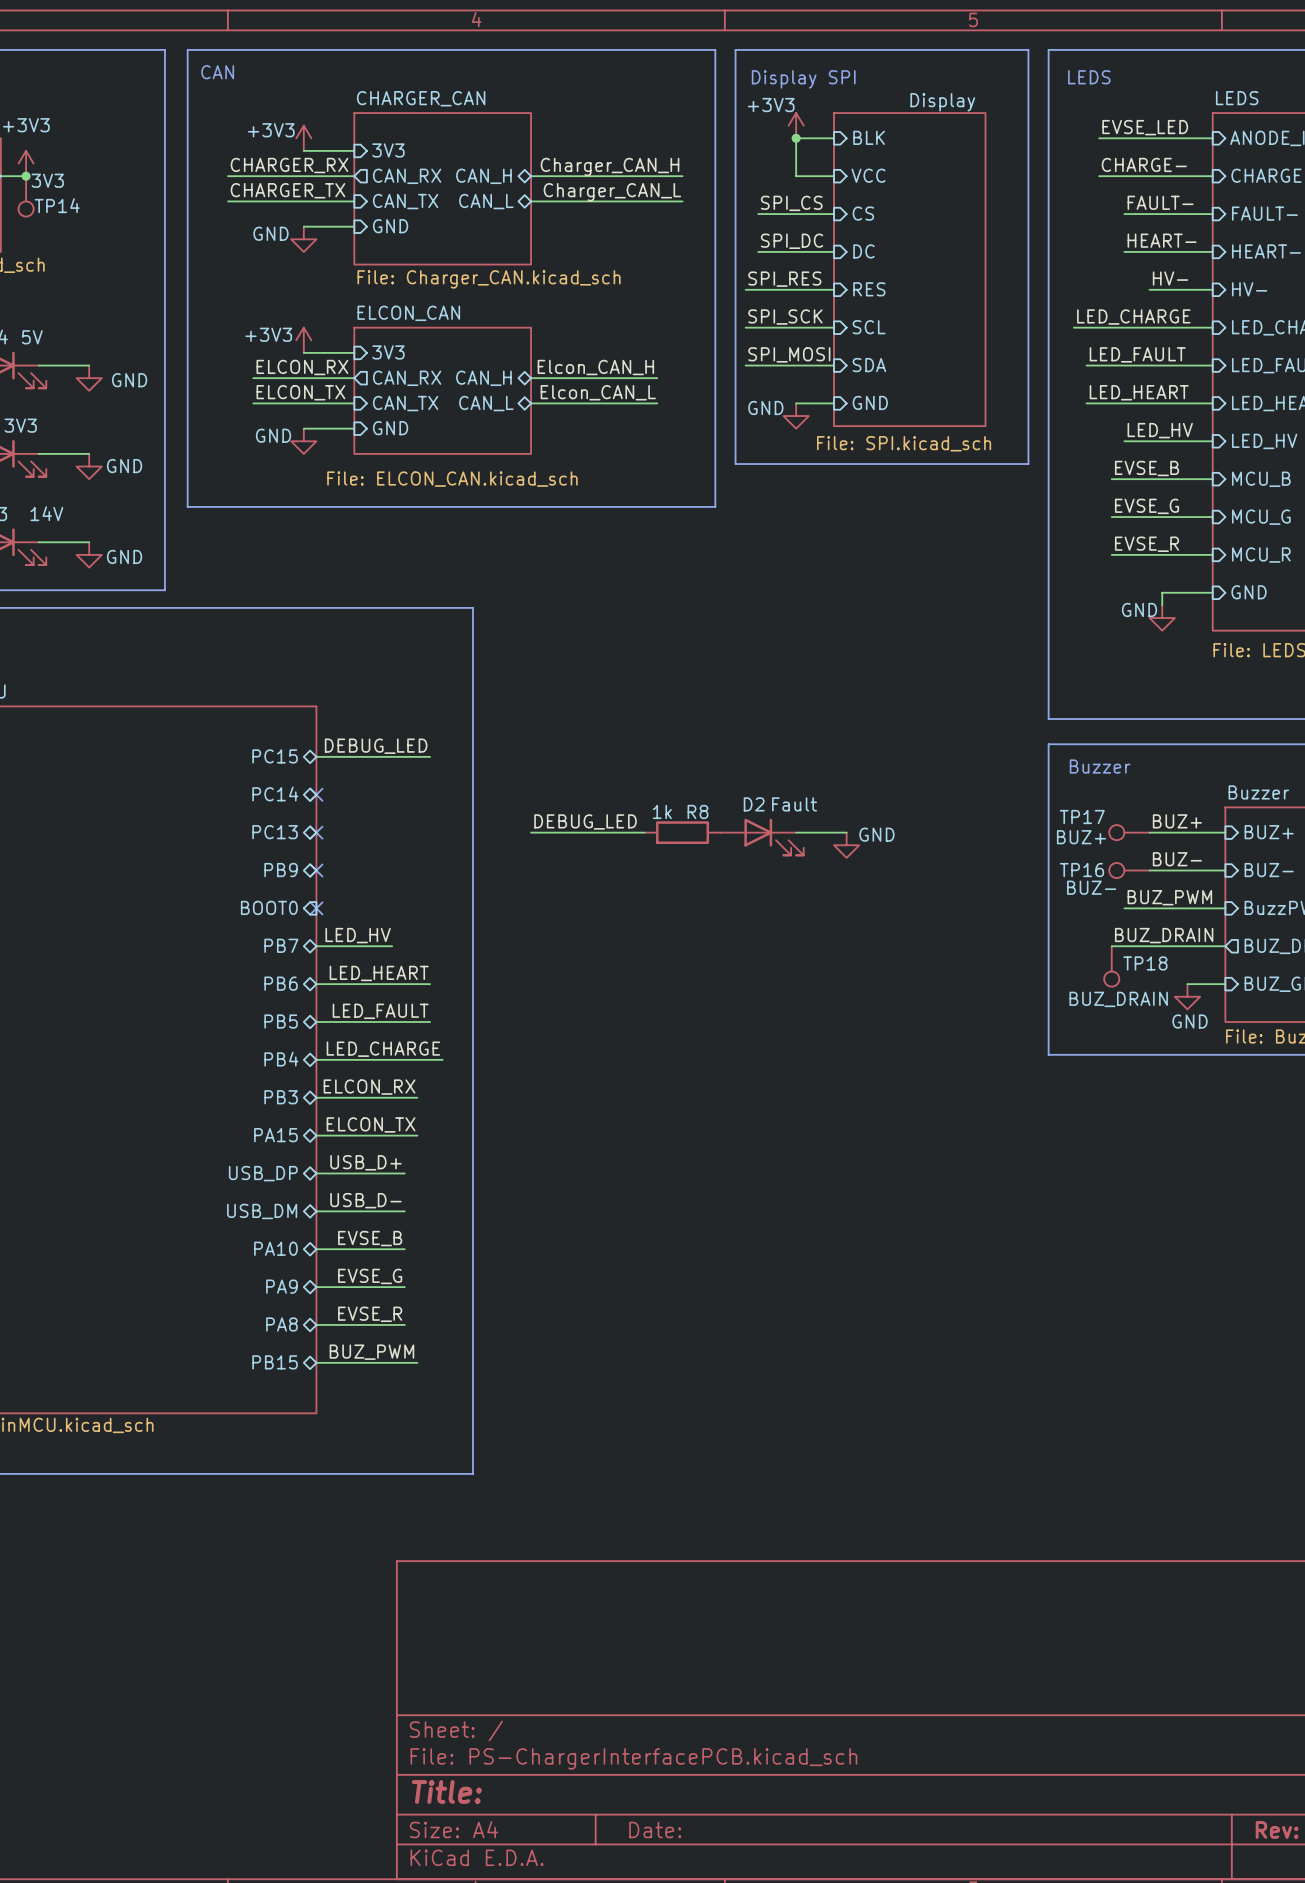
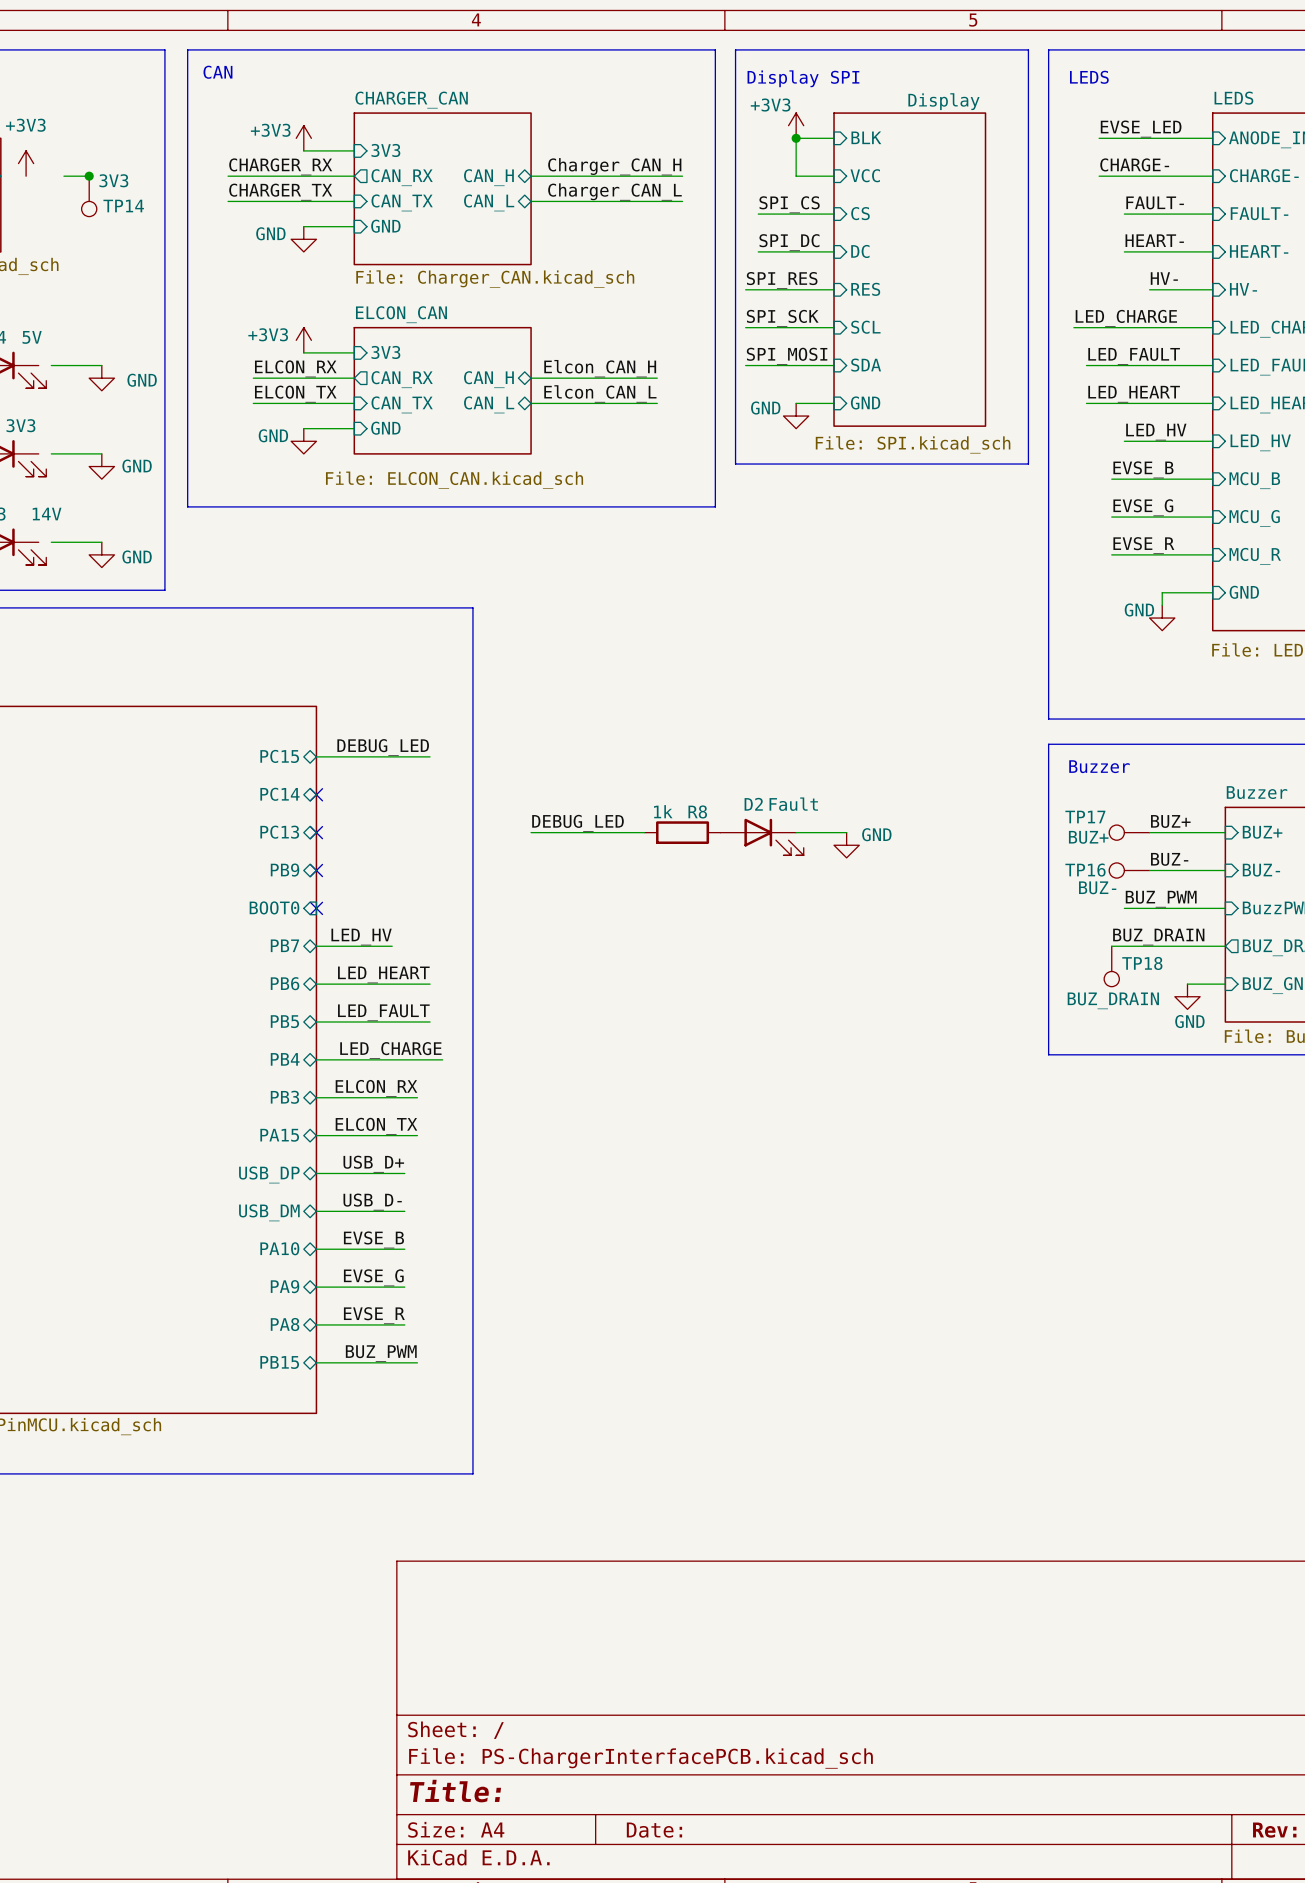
wire: (0, 176) (26, 176) -> (63, 176) (89, 176)
junction: (26, 176) -> none
junction: none -> (89, 176)
TP14 position: (26, 196) -> (89, 196)
wire: (38, 365) (51, 365) -> (89, 365) (101, 365)
power symbol position: GND (89, 378) -> GND (101, 378)
wire: (38, 453) (51, 453) -> (89, 453) (101, 453)
power symbol position: GND (89, 466) -> GND (101, 466)
wire: (38, 542) (51, 542) -> (89, 542) (101, 542)
power symbol position: GND (89, 554) -> GND (101, 554)

